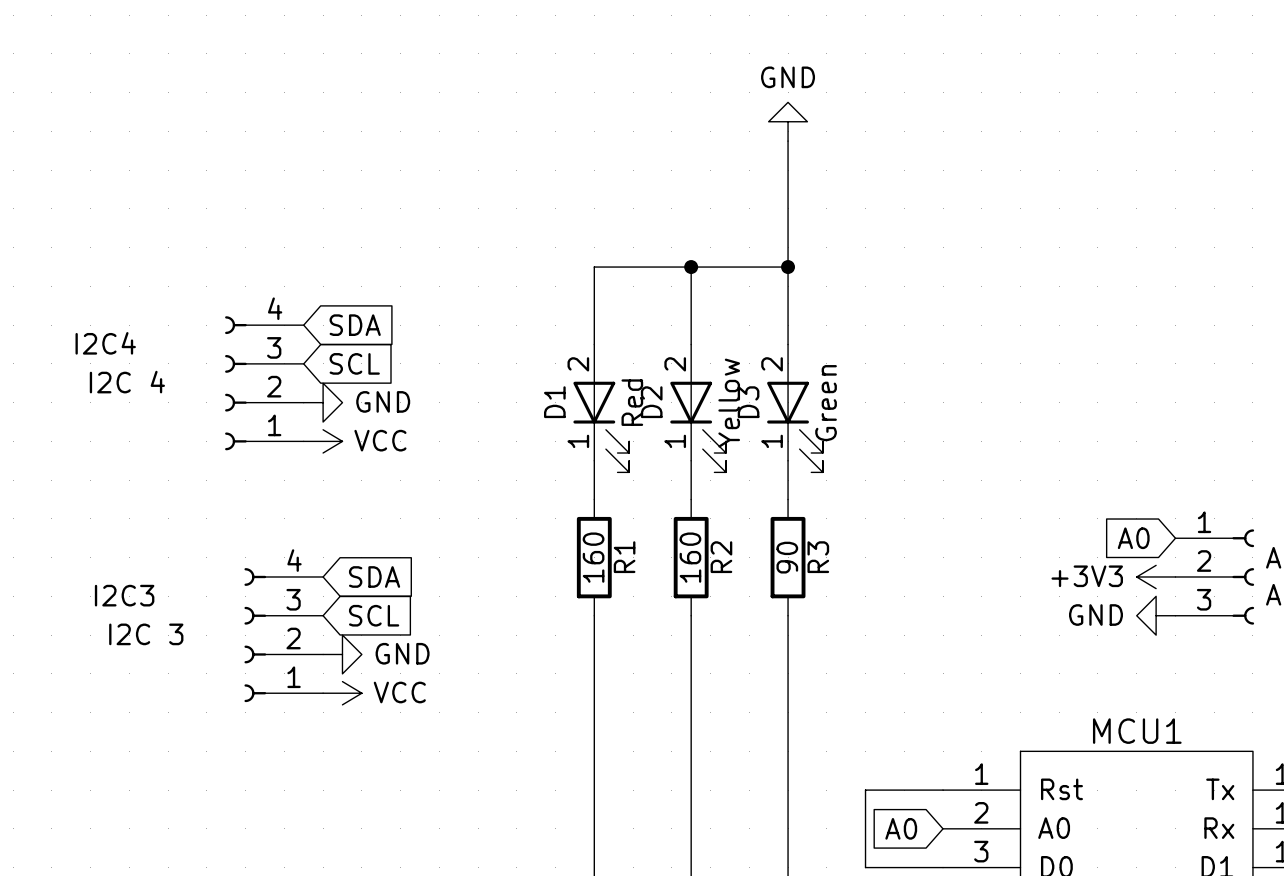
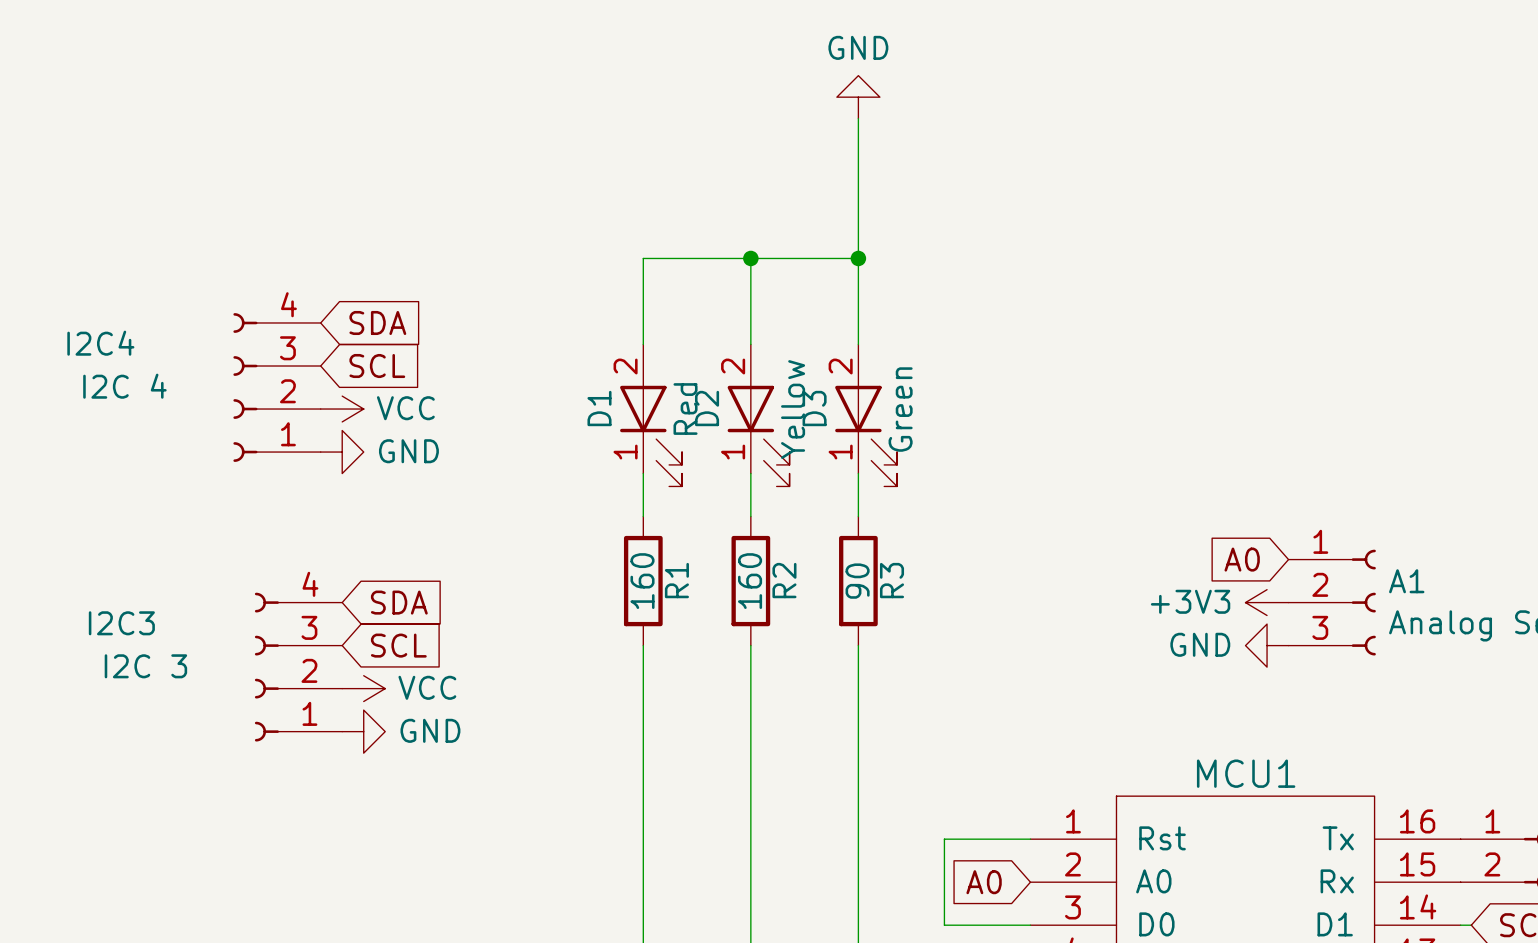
power symbol: GND (323, 402) -> VCC (342, 409)
power symbol: VCC (323, 441) -> GND (342, 452)
power symbol: GND (342, 654) -> VCC (363, 688)
power symbol: VCC (342, 693) -> GND (363, 731)

